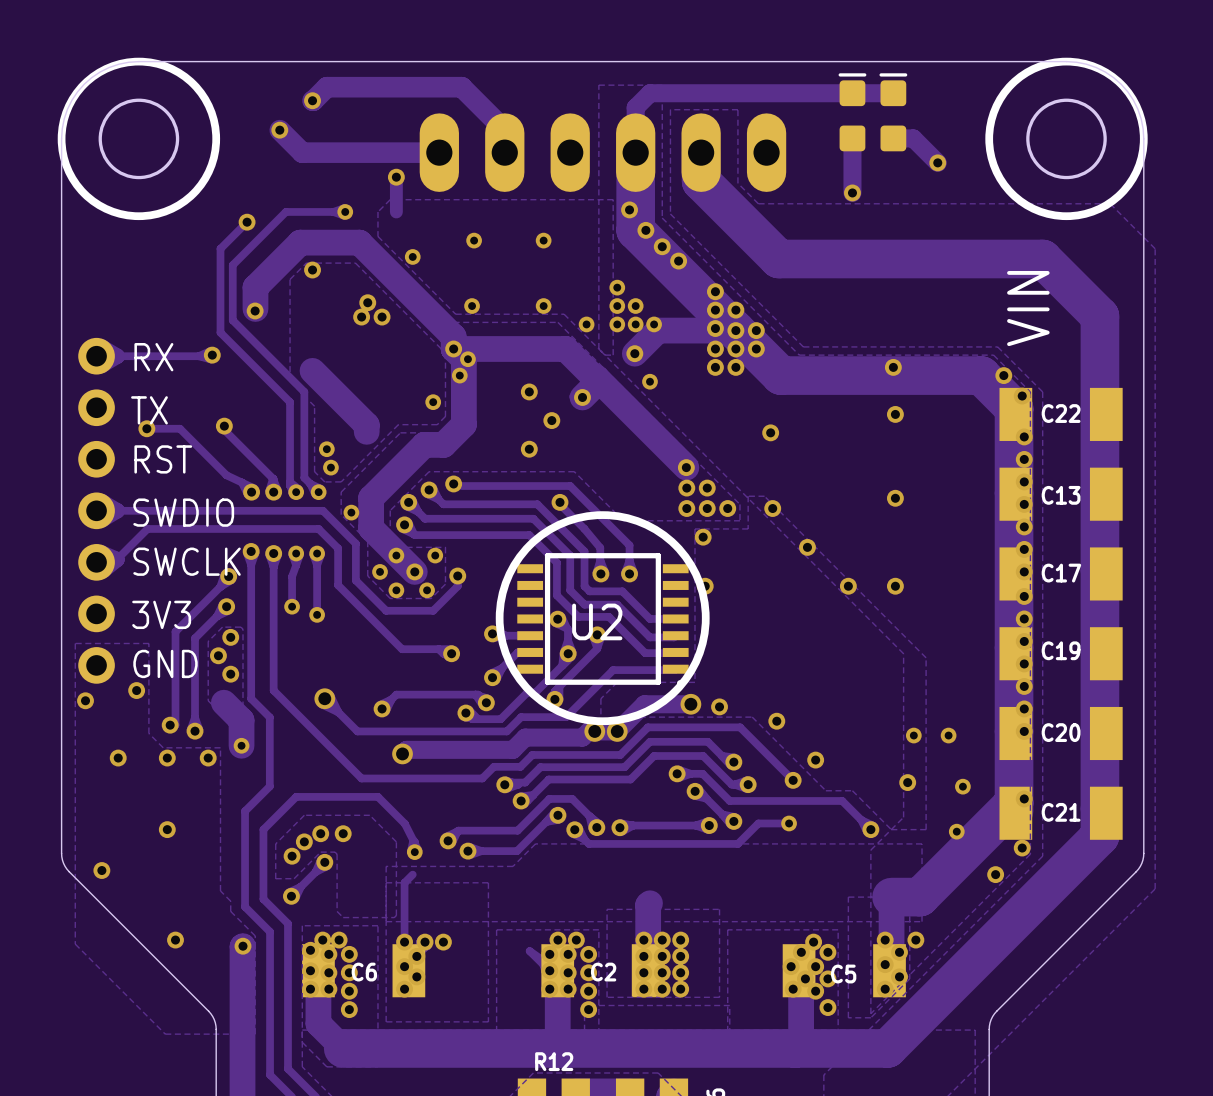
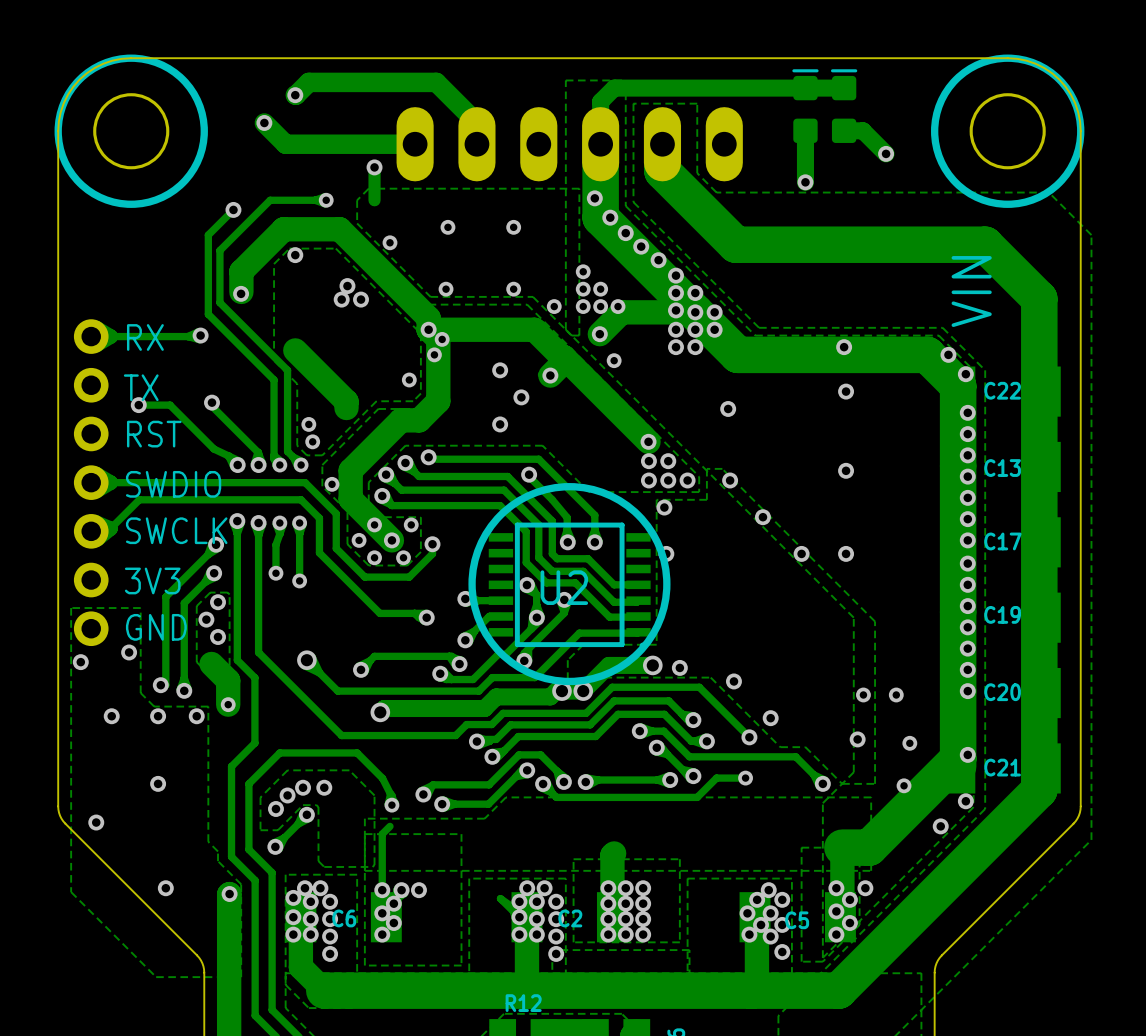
via: none -> (658, 260)

